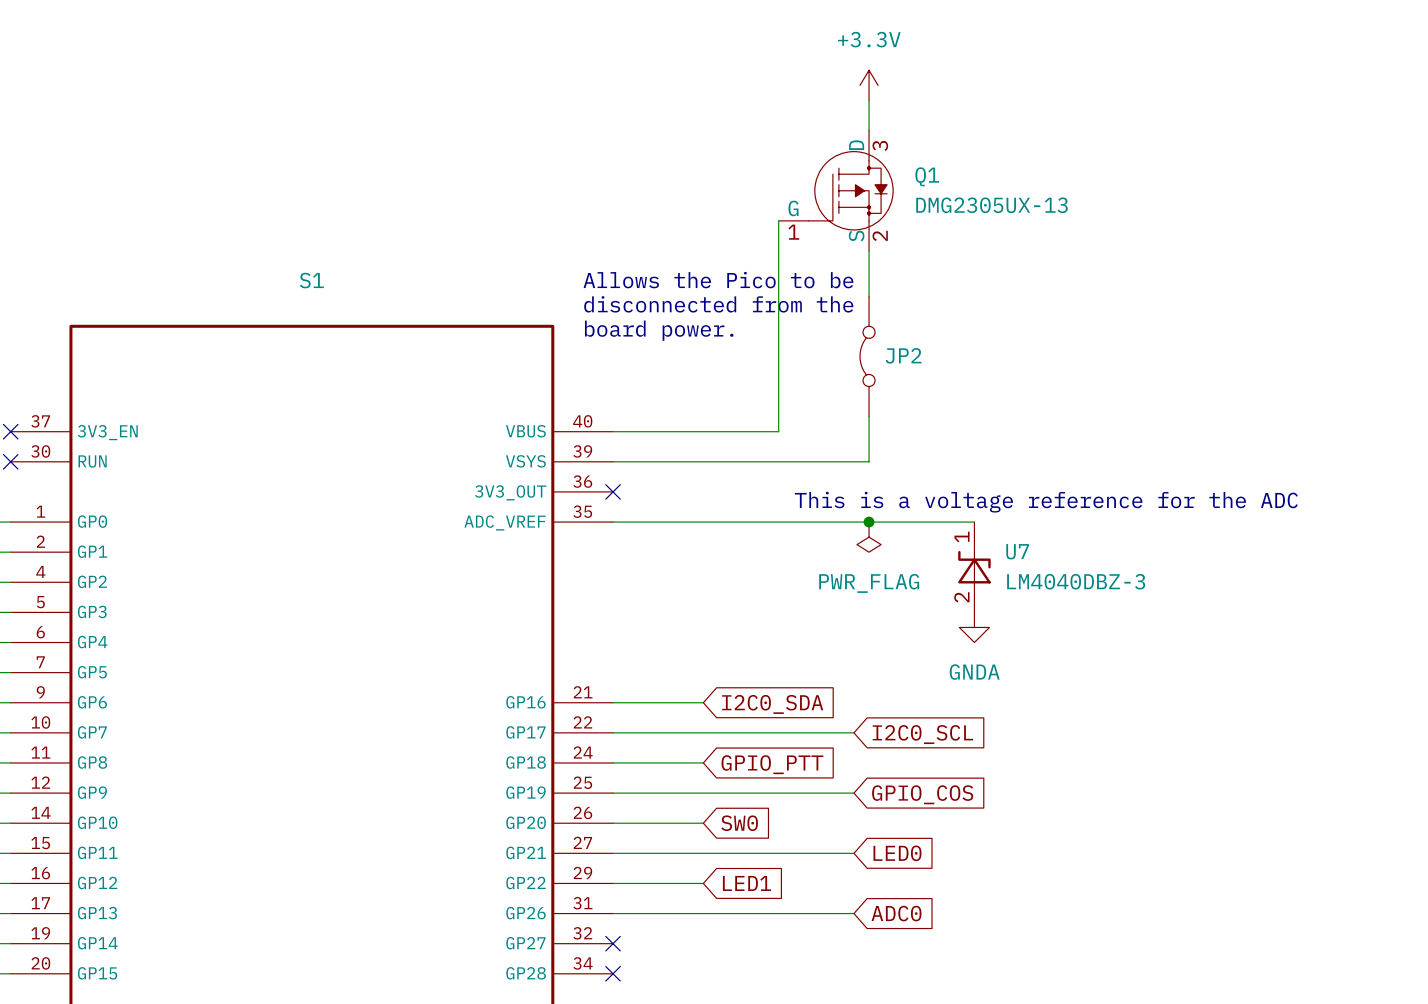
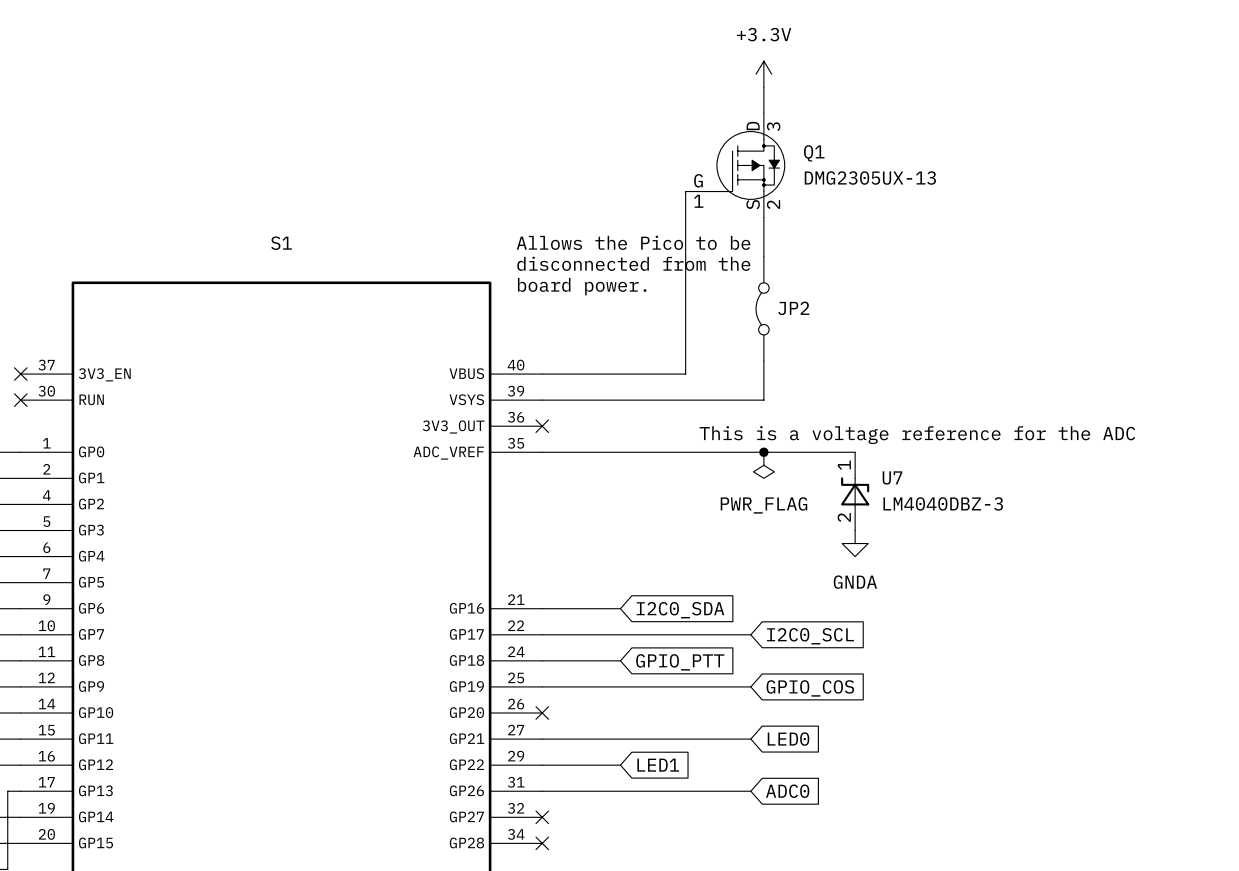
wire: (613, 823) (703, 823) -> none
no-connect mark: none -> (542, 713)
global label: SW0 (739, 823) -> none

